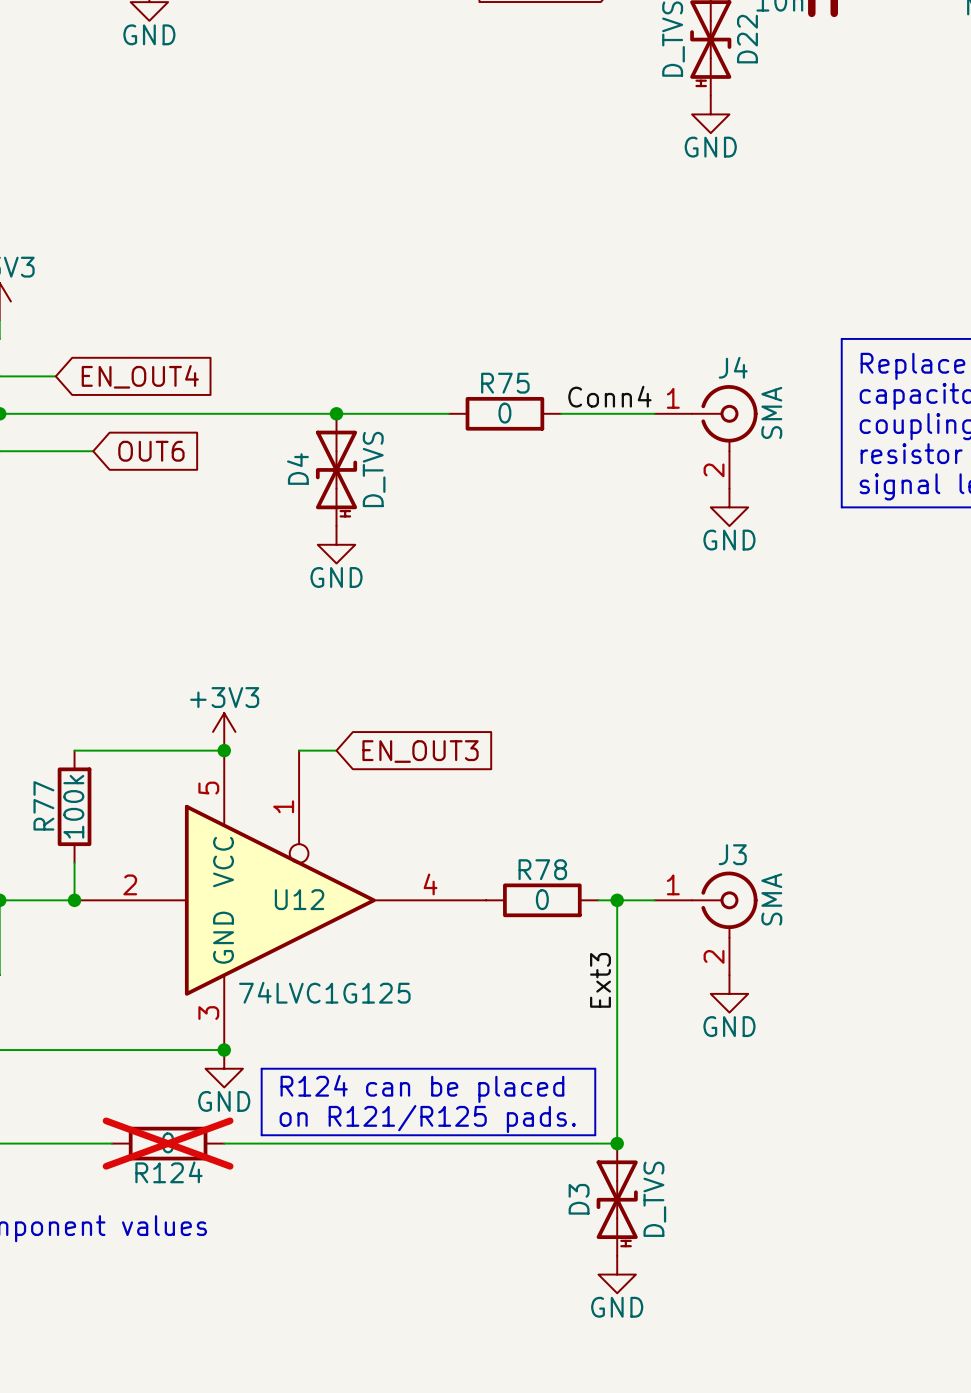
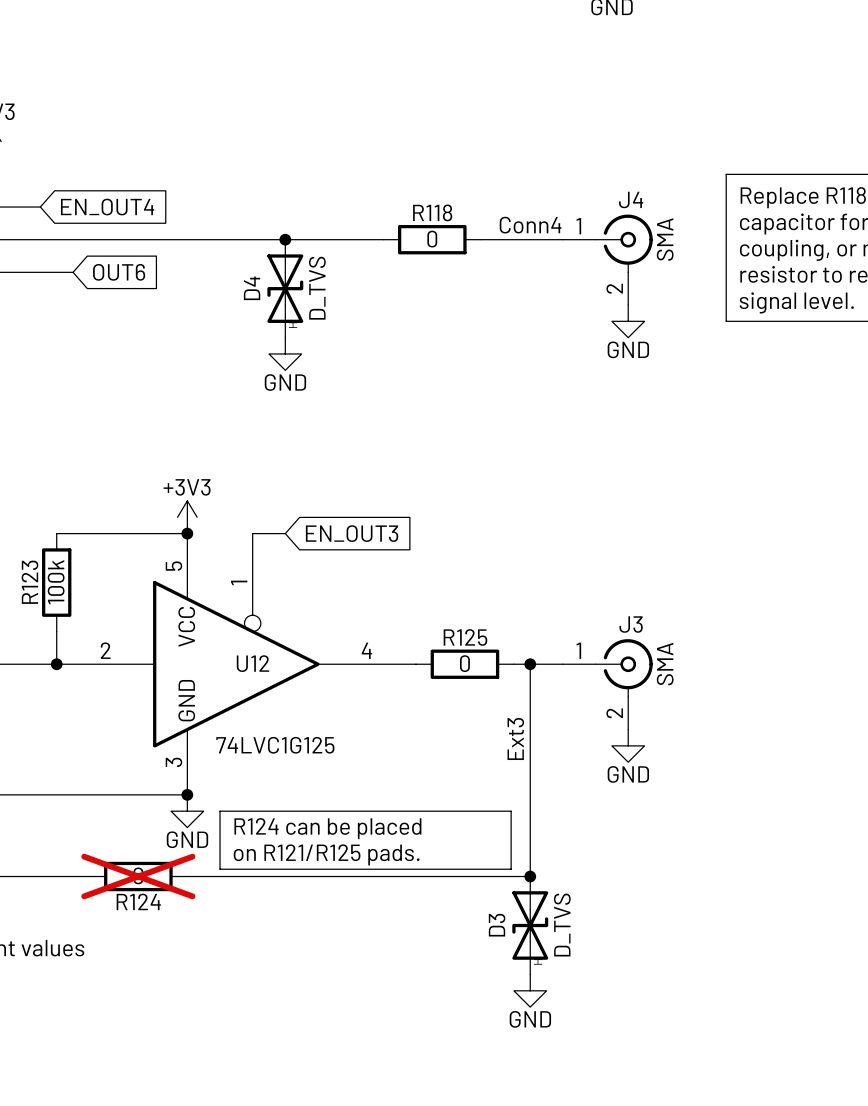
R75 name: R75 (505, 383) -> R118 (432, 212)
R77 name: R77 (43, 805) -> R123 (29, 582)
R78 name: R78 (542, 869) -> R125 (465, 637)

